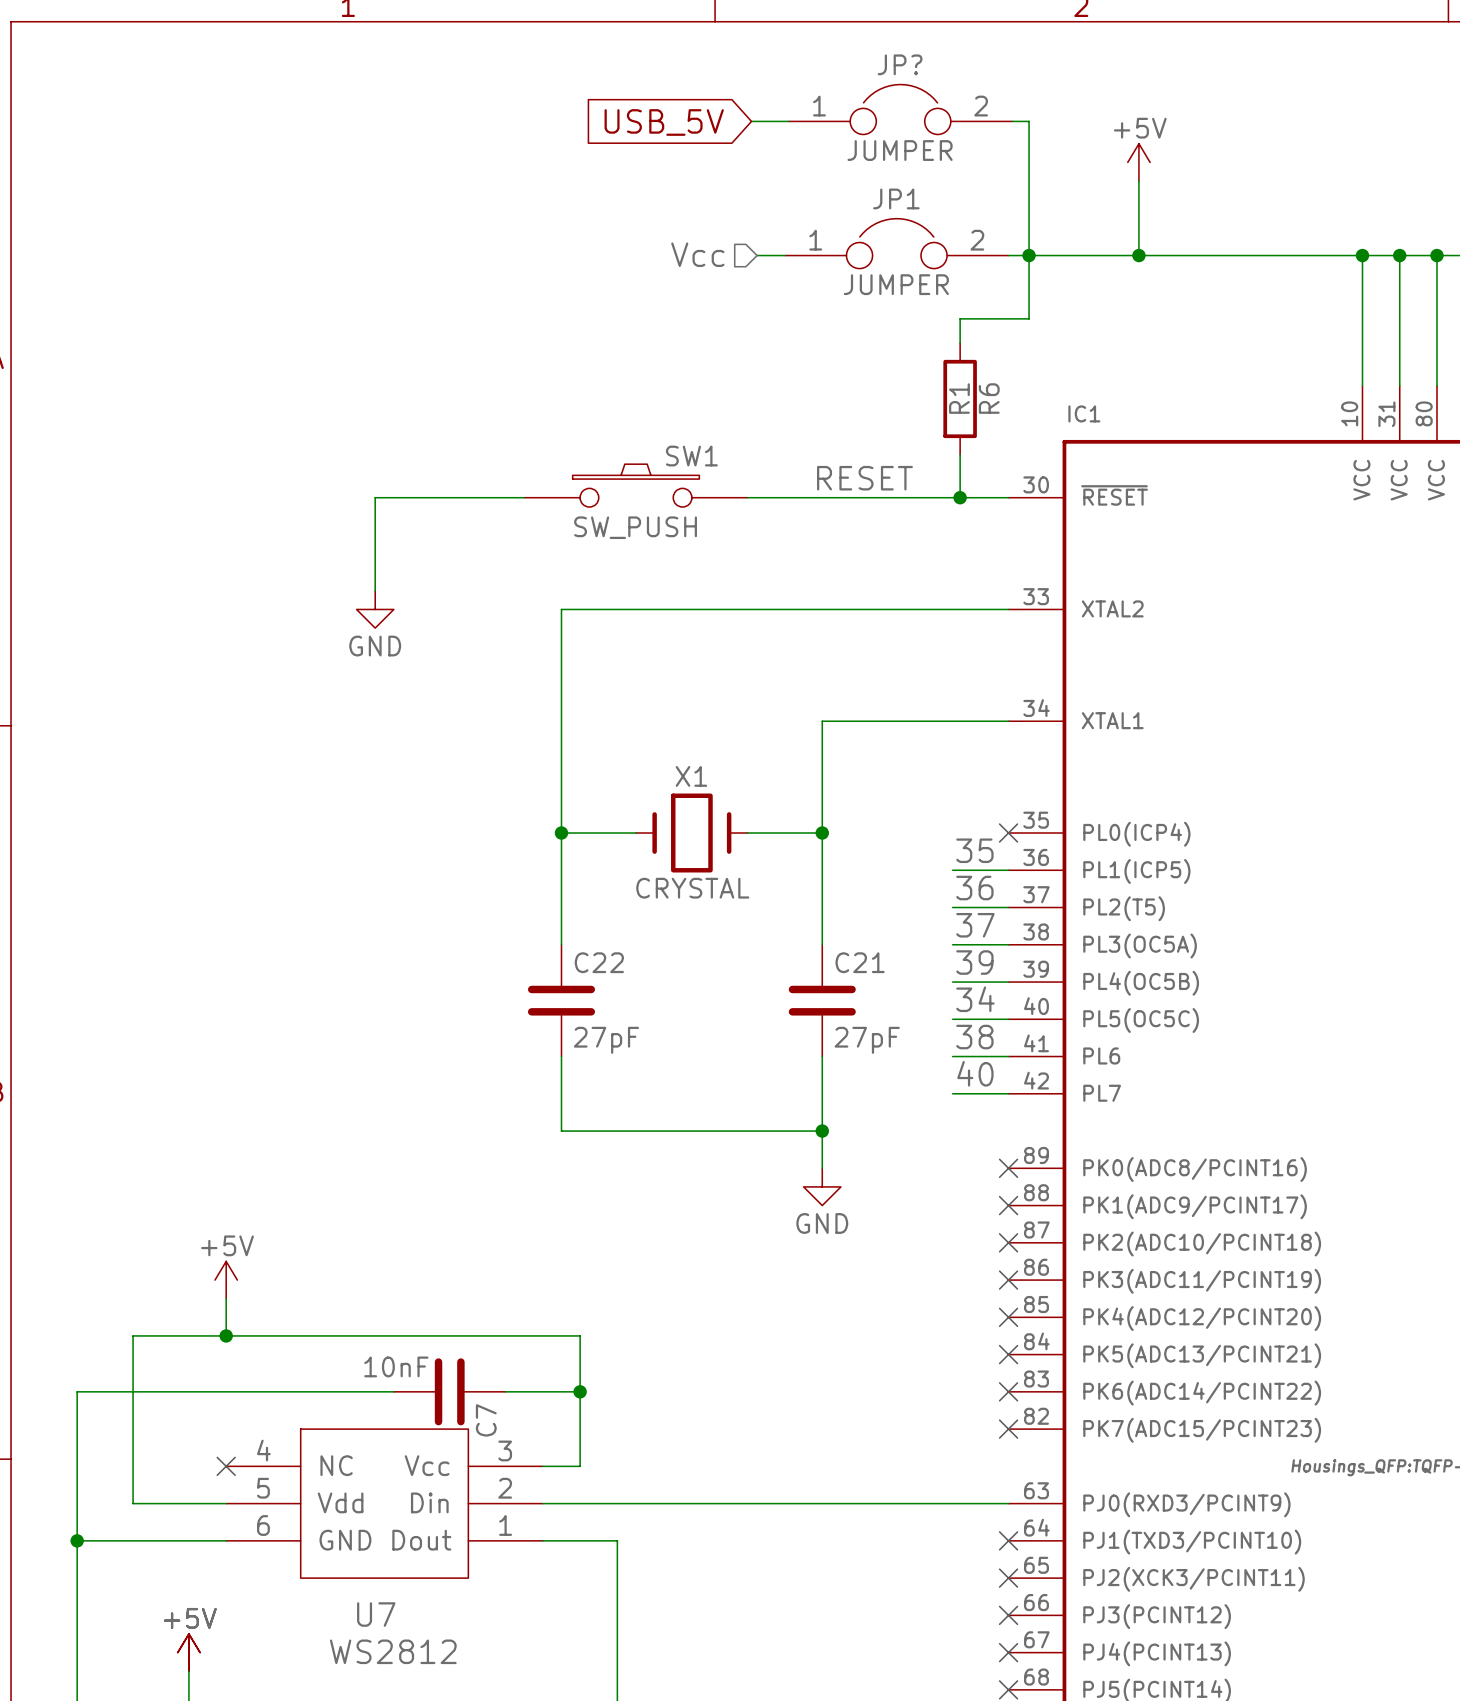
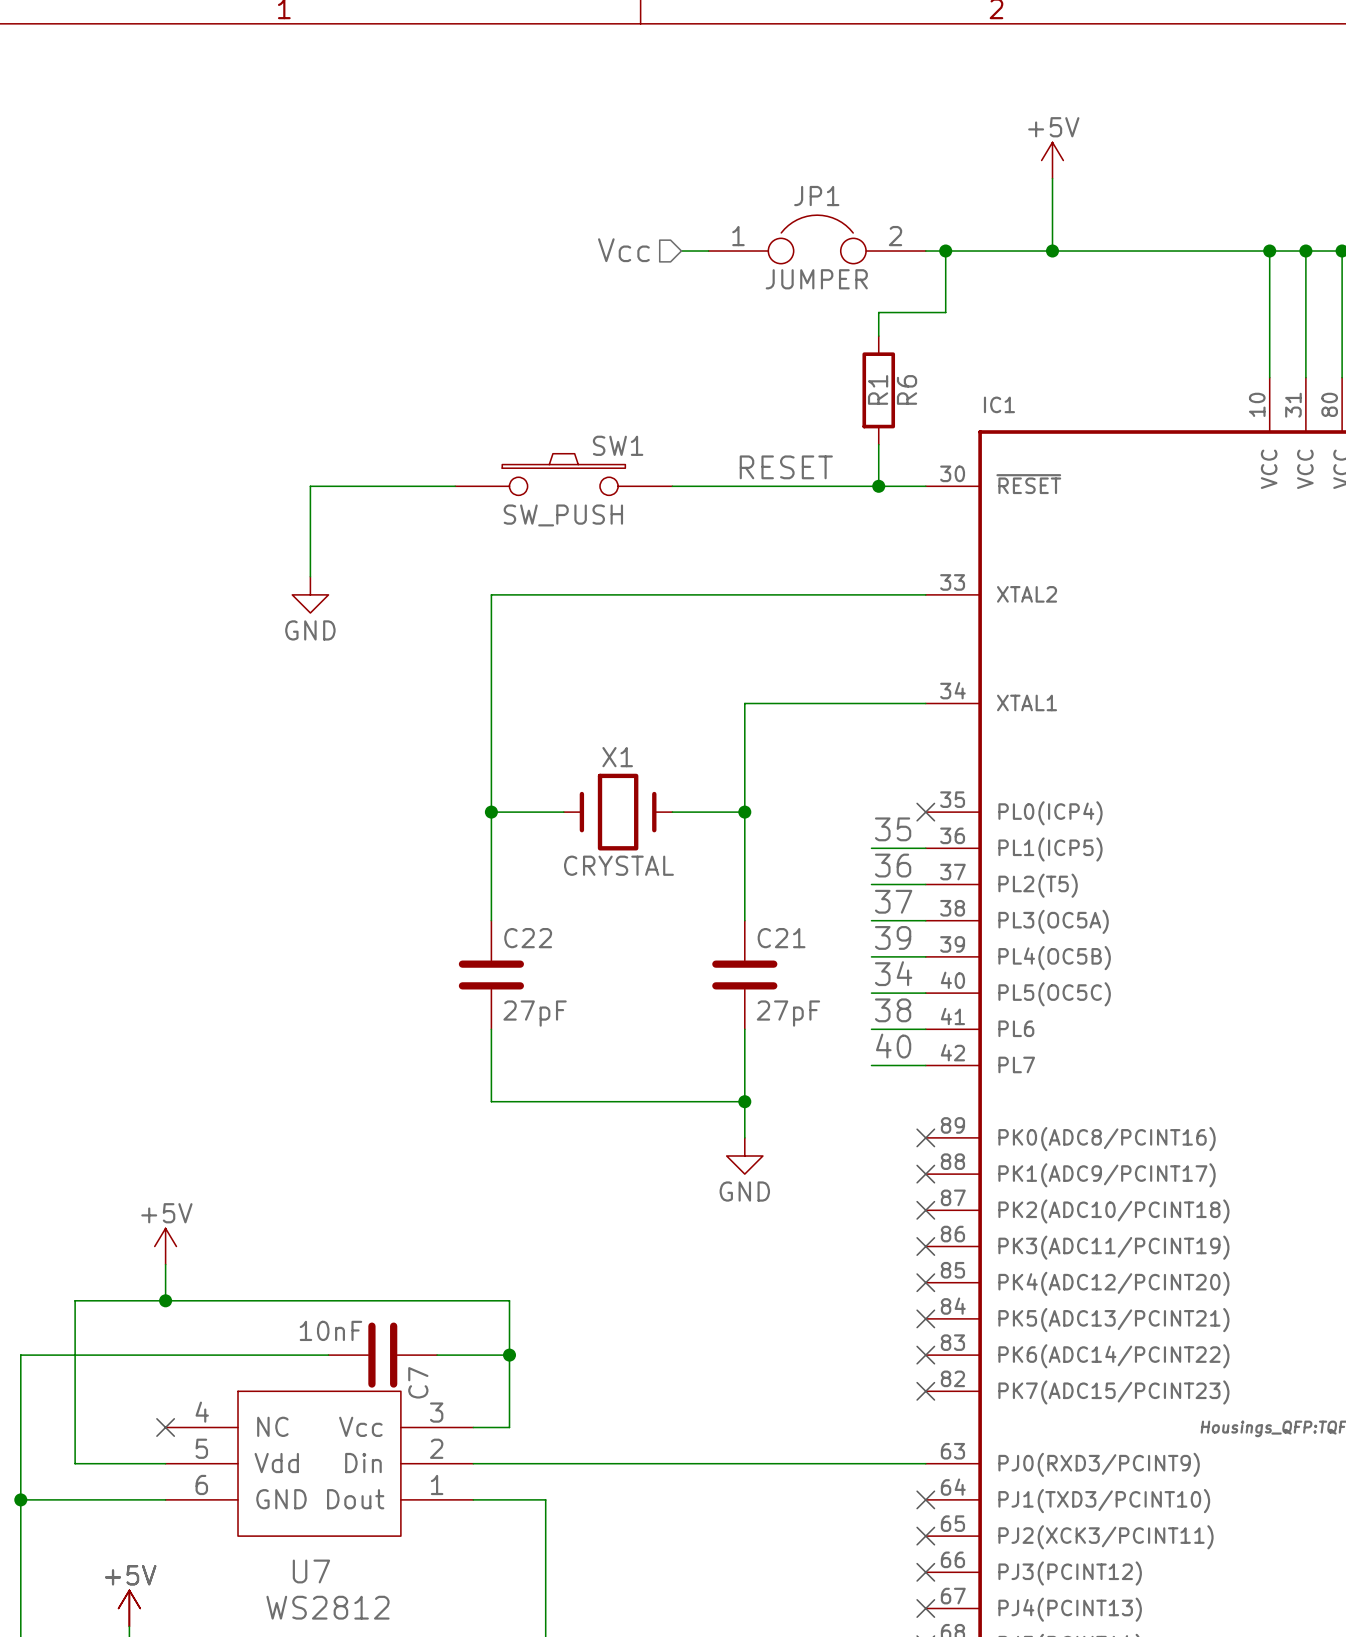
JP?: JUMPER (900, 109) -> none
wire: (751, 121) (788, 121) -> none
wire: (1012, 121) (1029, 121) (1029, 255) -> none
global label: USB_5V (664, 122) -> none

